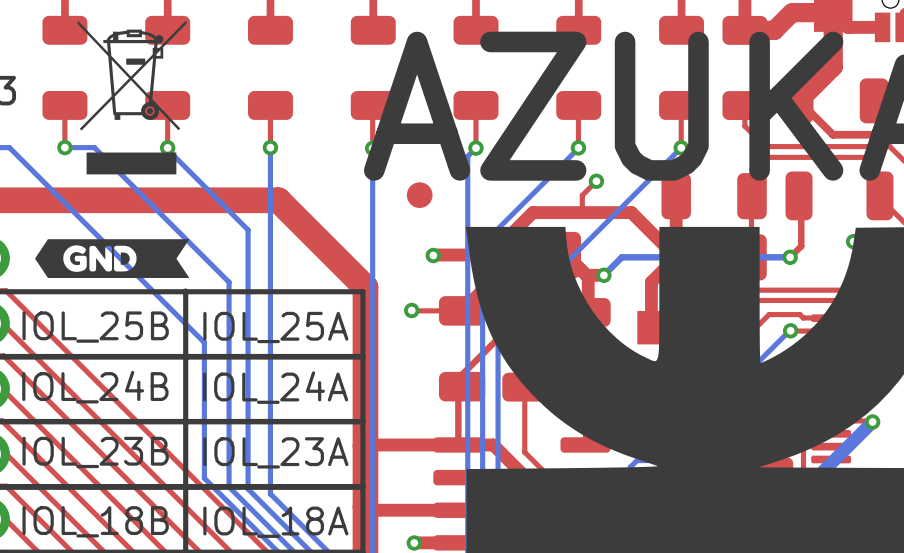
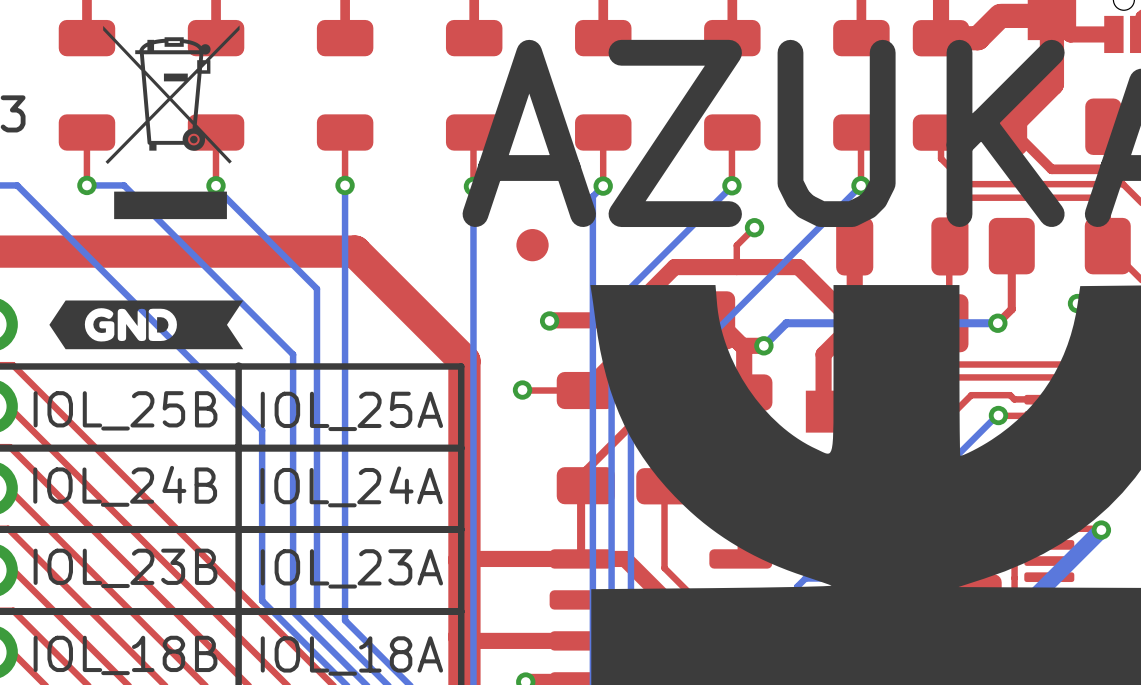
part footprint: [785, 171, 894, 221] -> [988, 217, 1131, 275]

